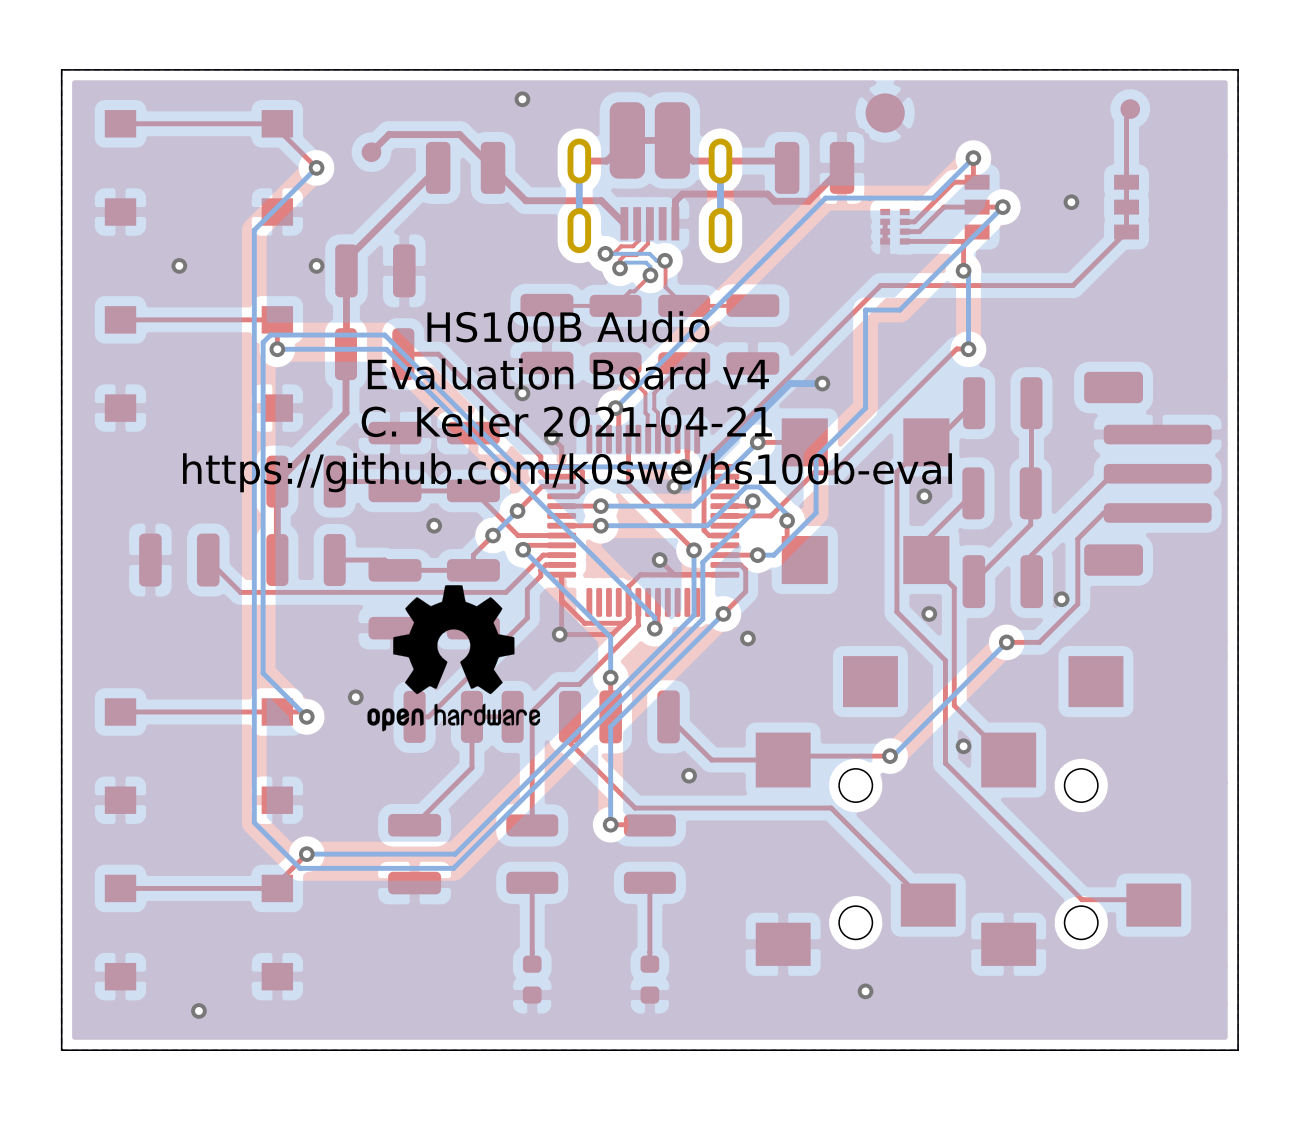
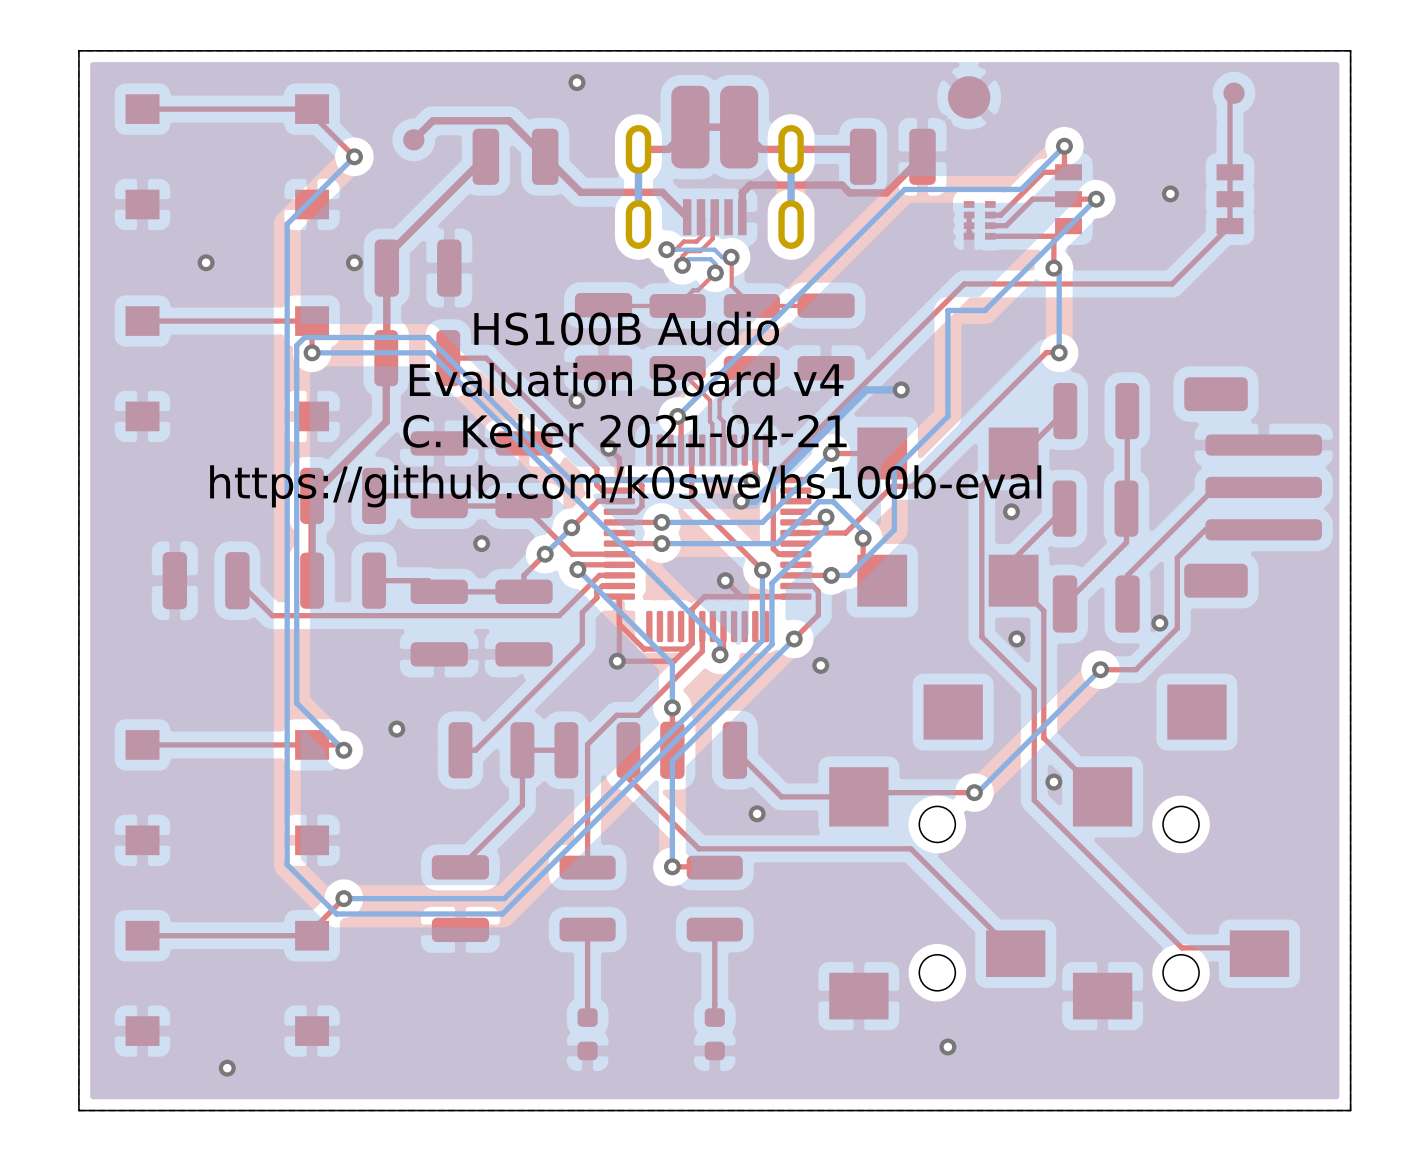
drawing: [367, 585, 541, 732] -> none

